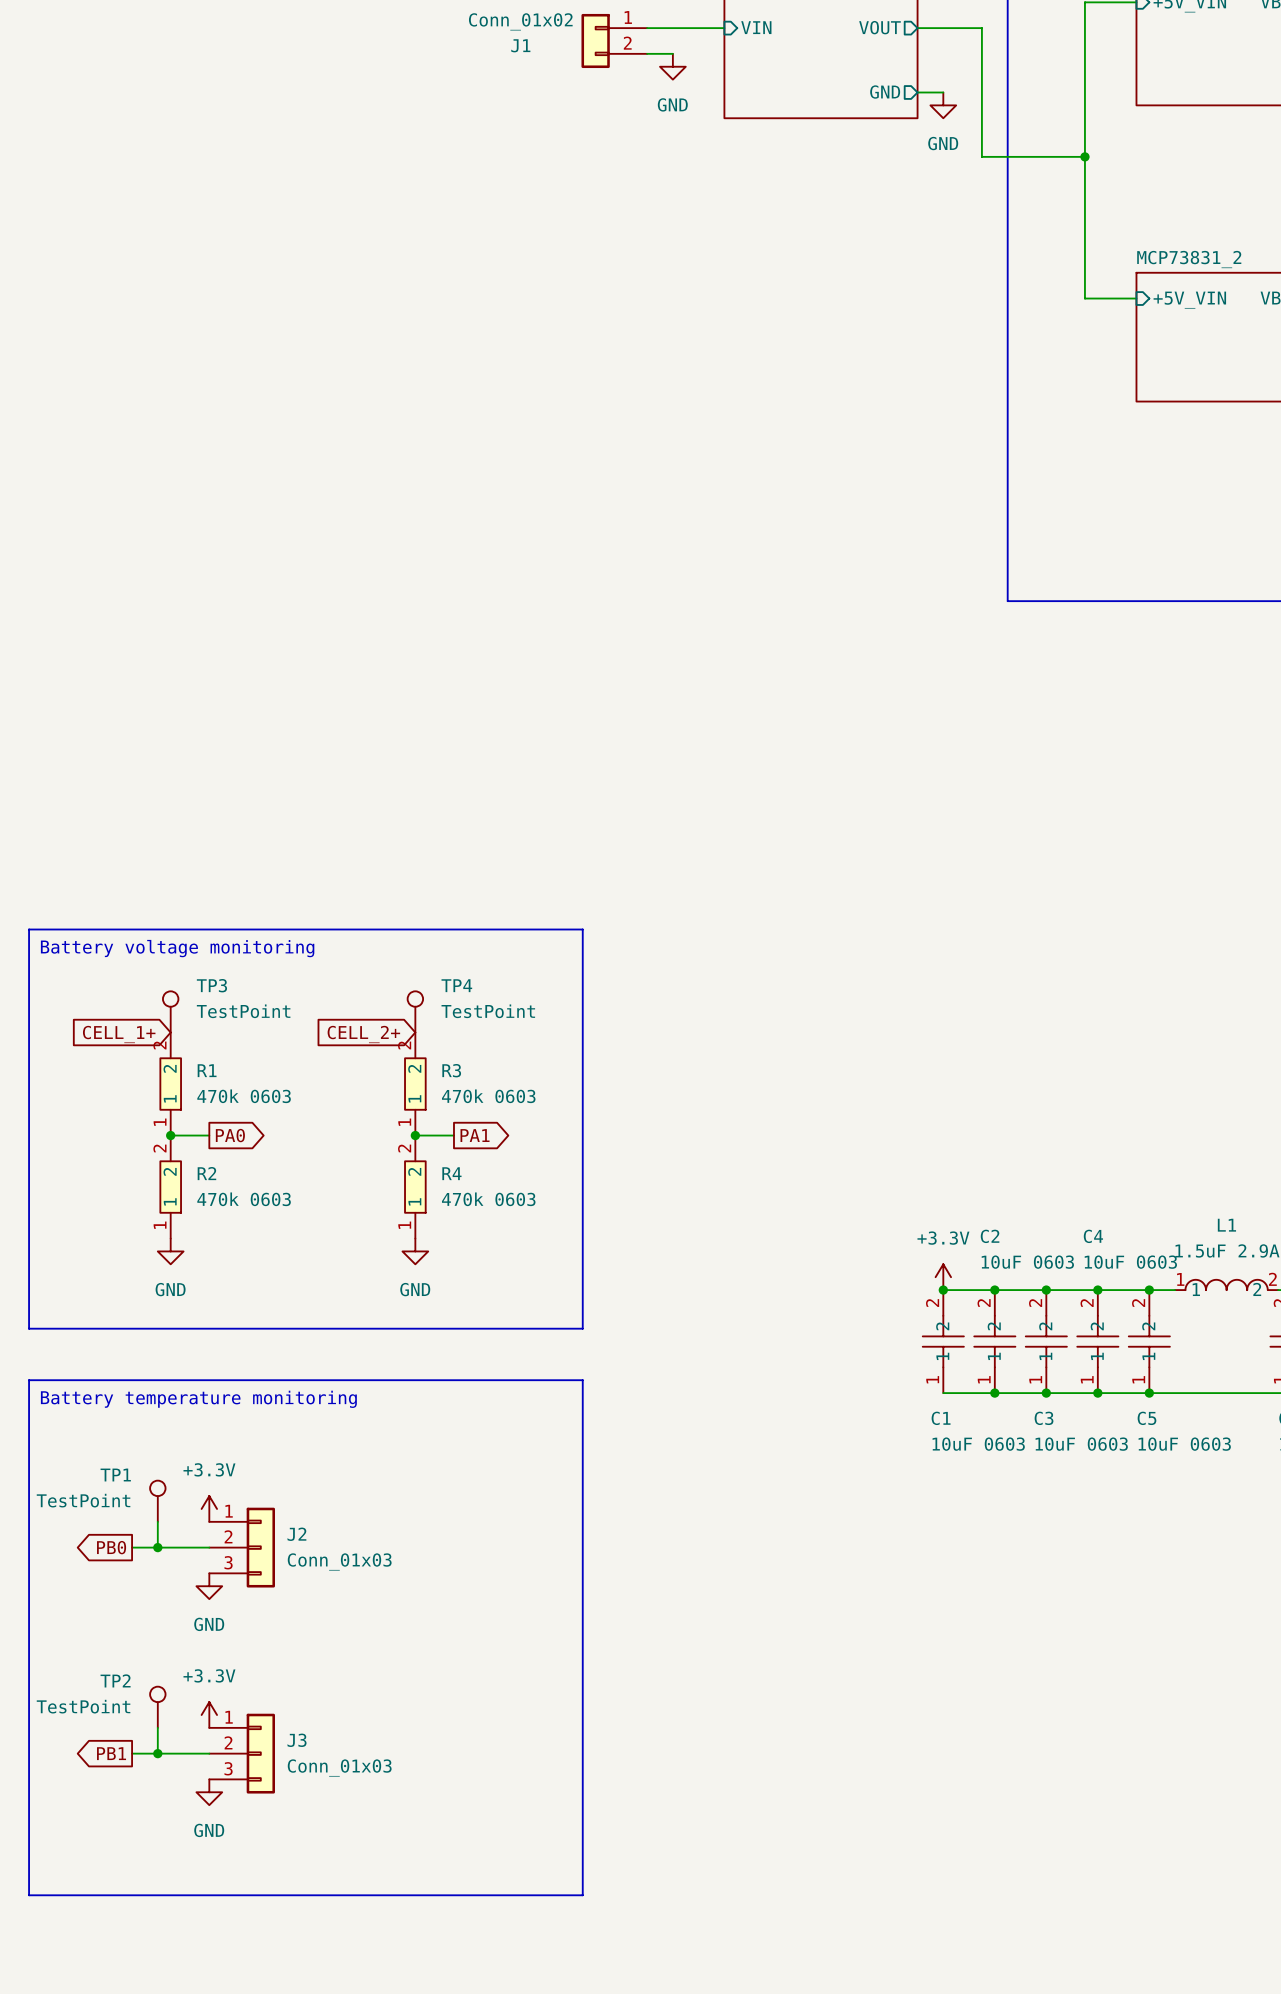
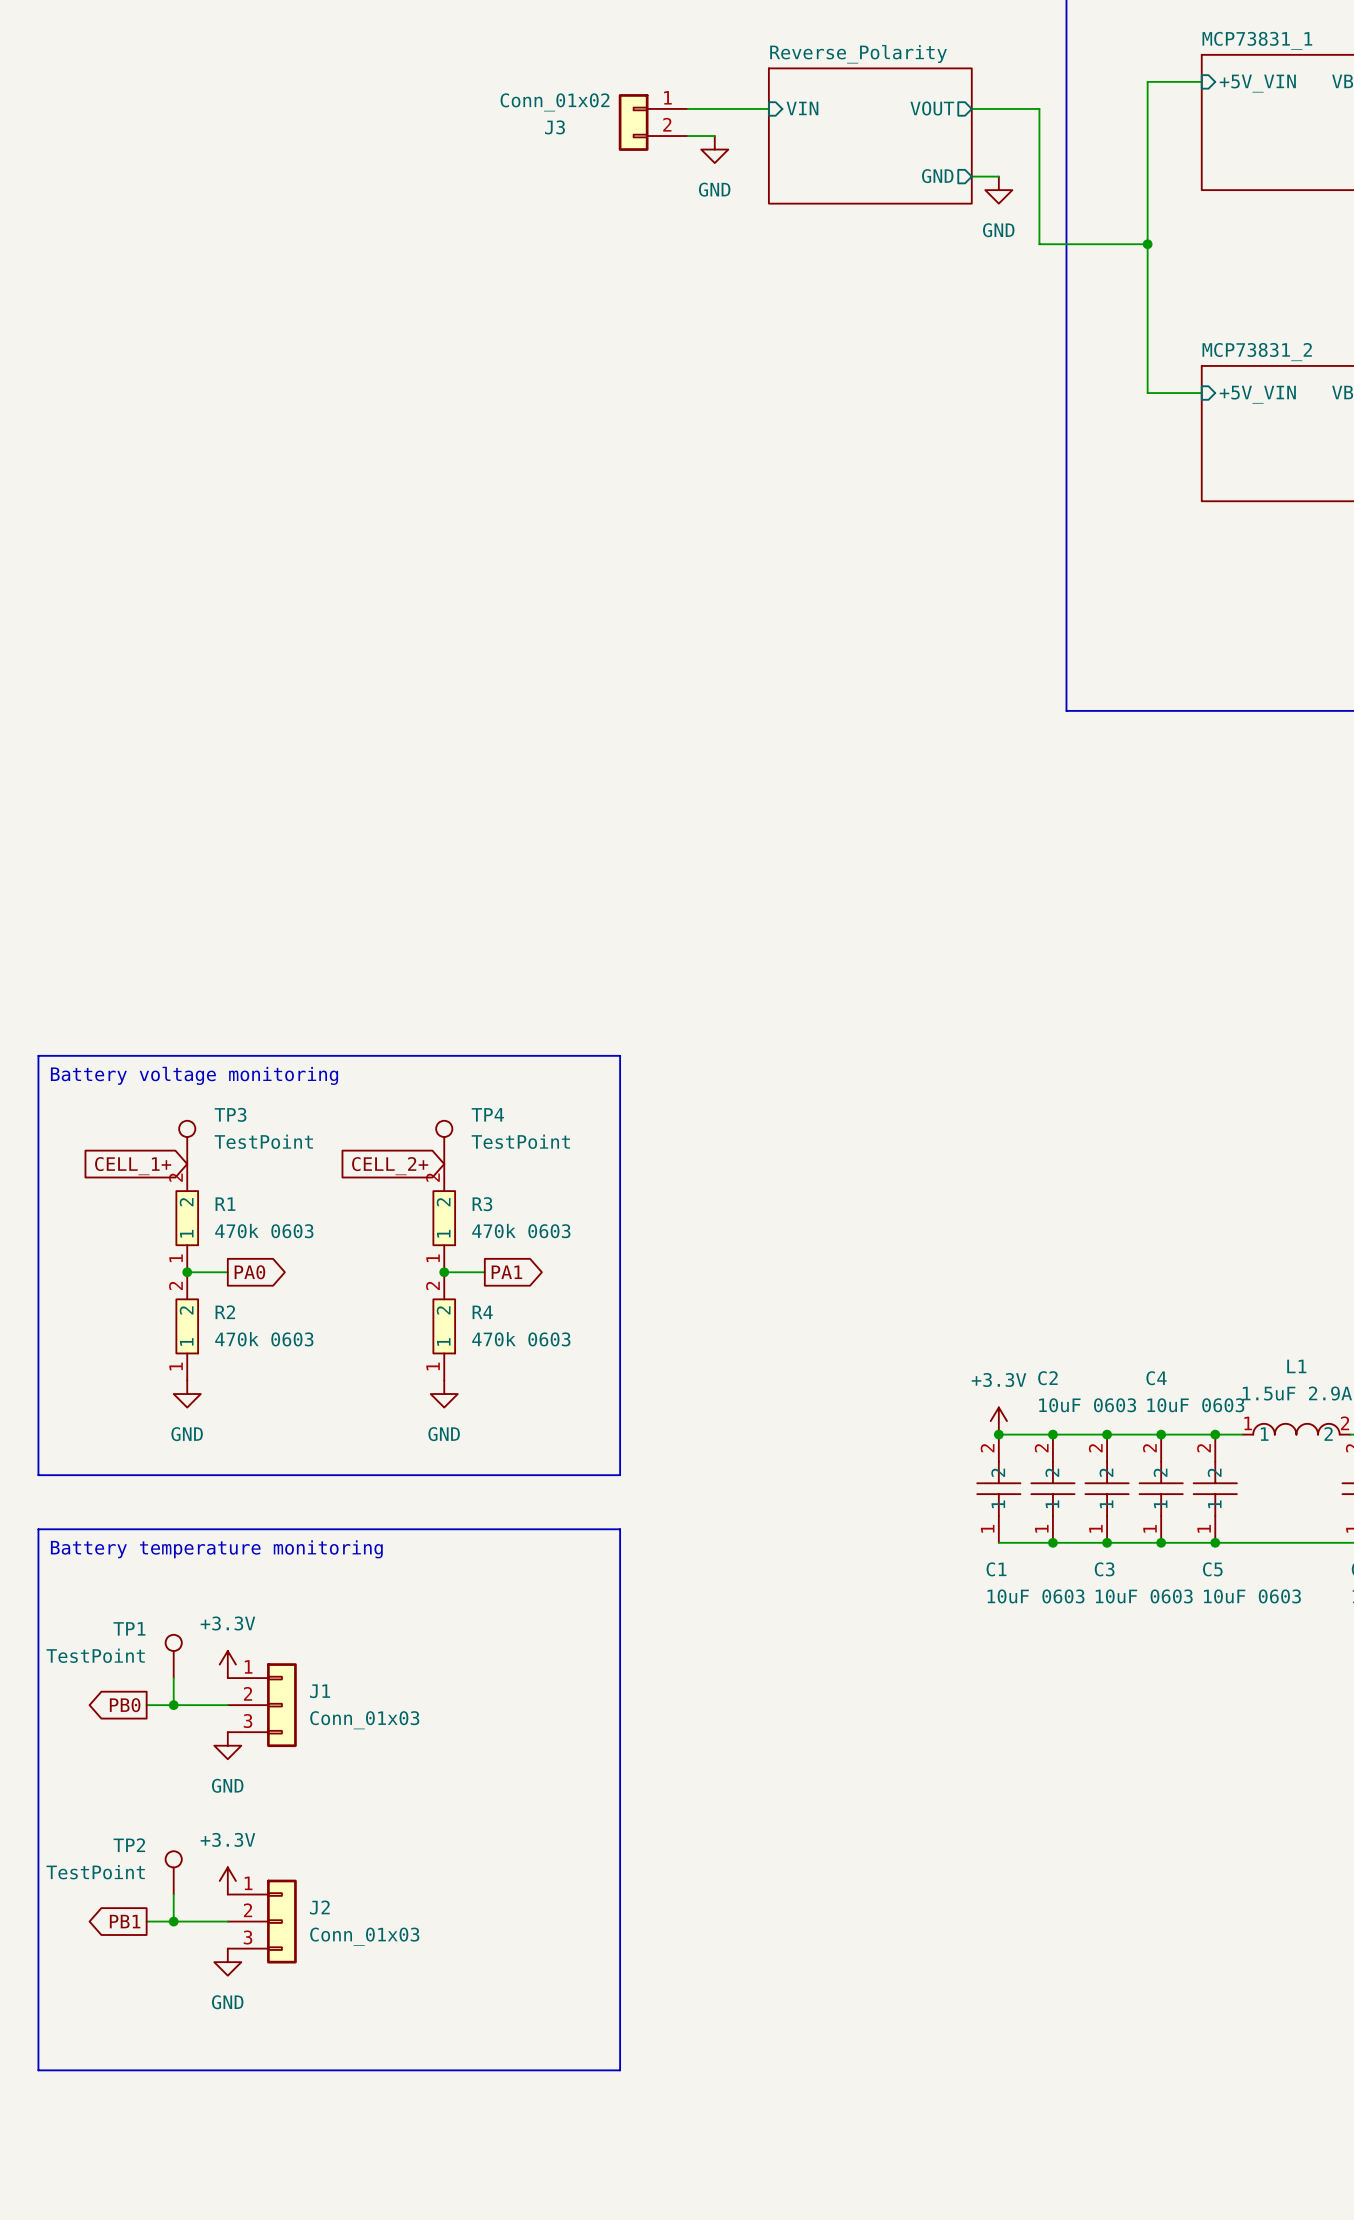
J1 name: J1 (520, 45) -> J3 (554, 127)
J2 name: J2 (296, 1534) -> J1 (320, 1691)
J3 name: J3 (297, 1740) -> J2 (319, 1907)

